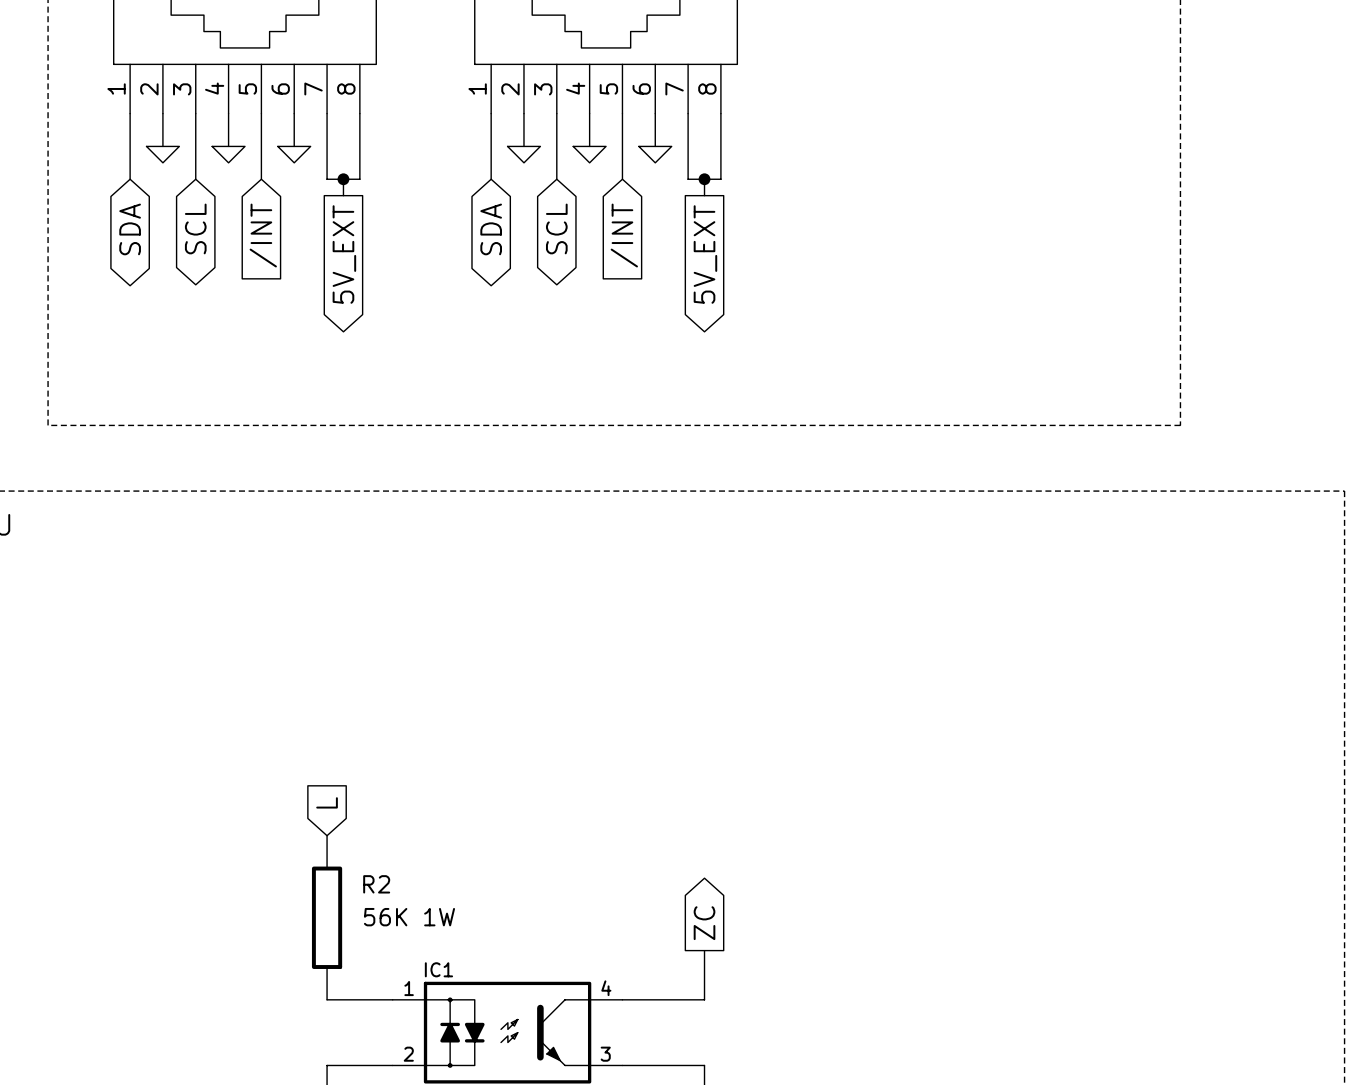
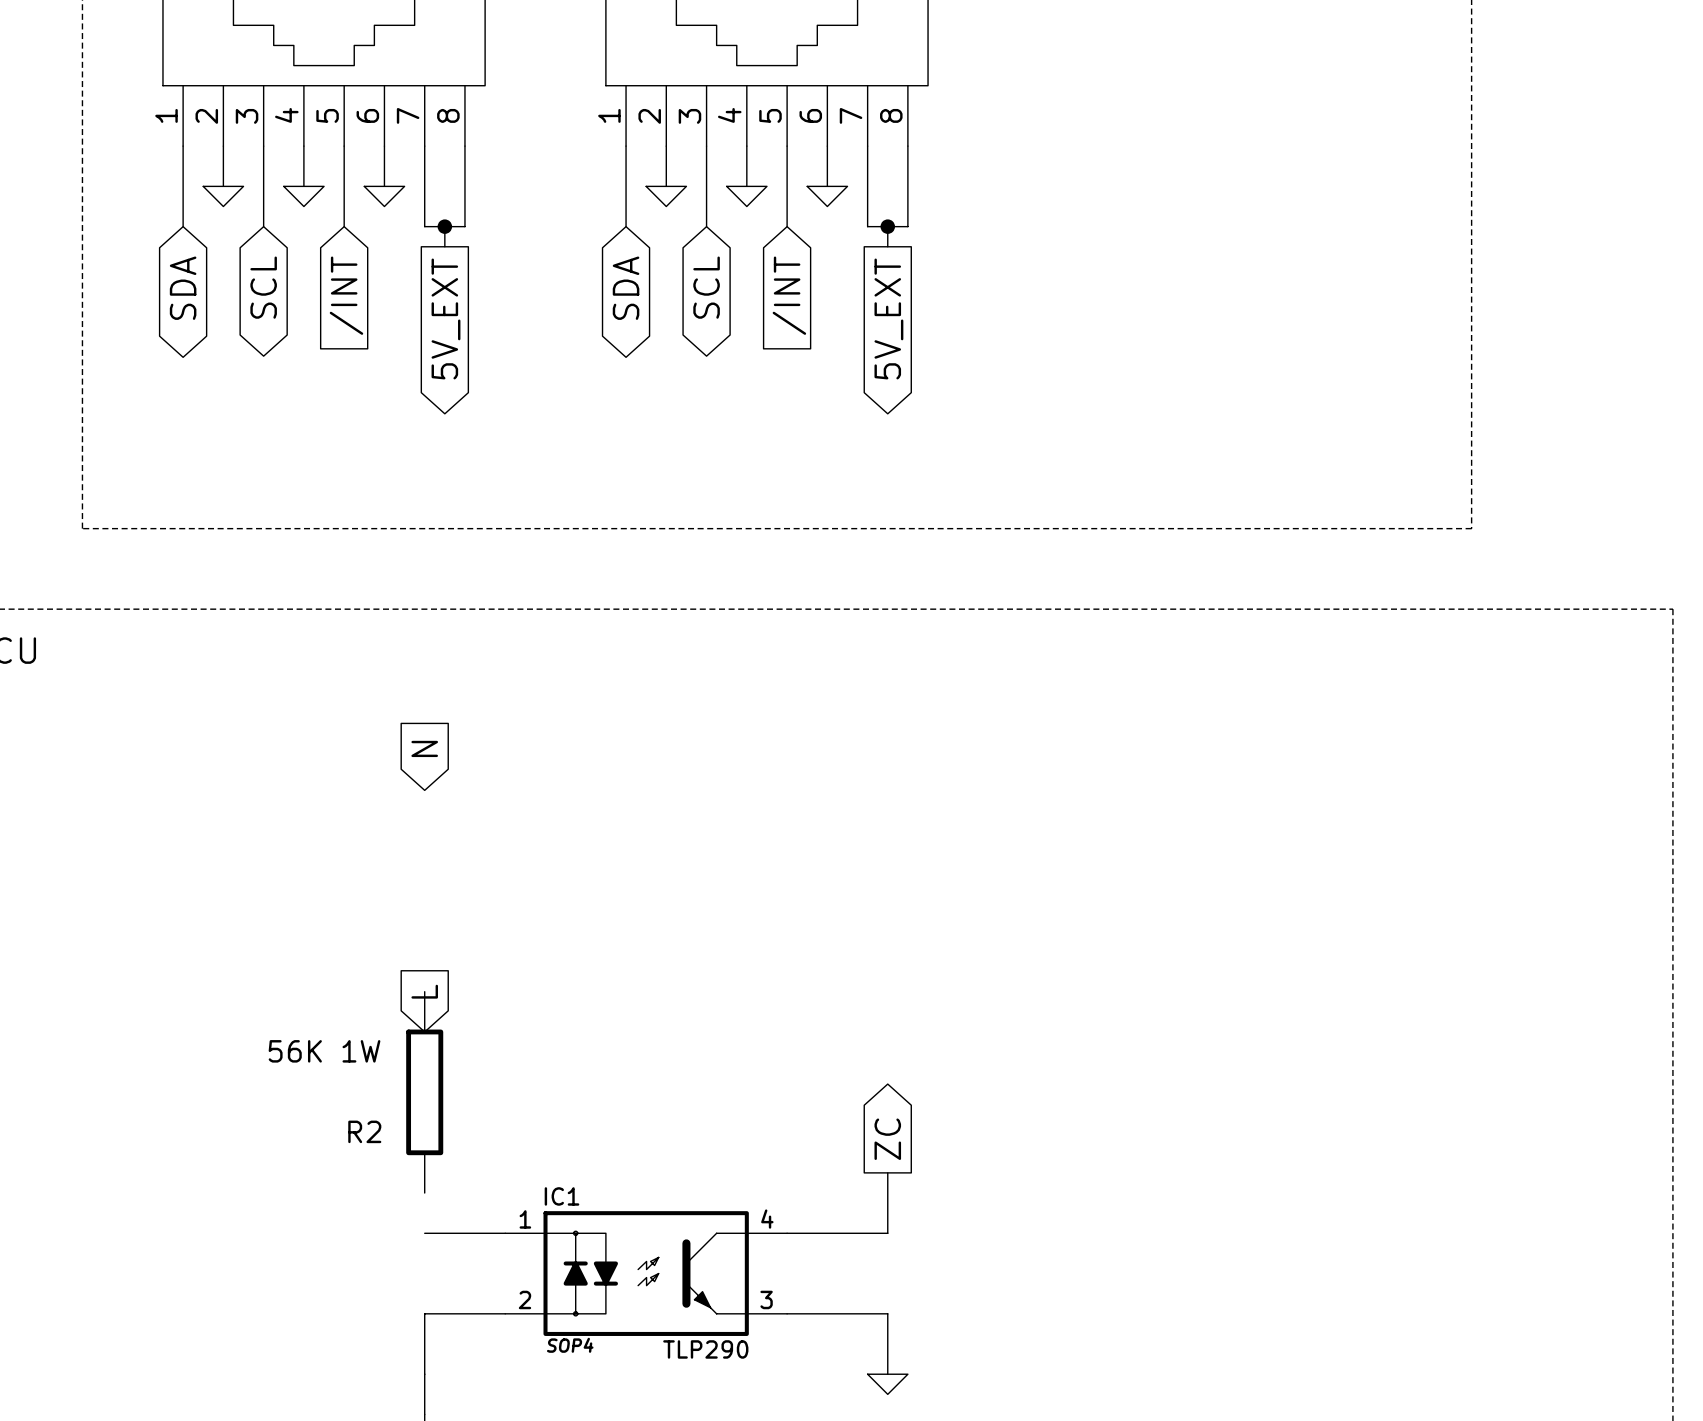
global label: none -> N (424, 748)
R2 name position: R2 (376, 884) -> R2 (364, 1131)
R2 position: (327, 917) -> (424, 1092)
R2 value position: 56K 1W (409, 917) -> 56K 1W (324, 1051)

